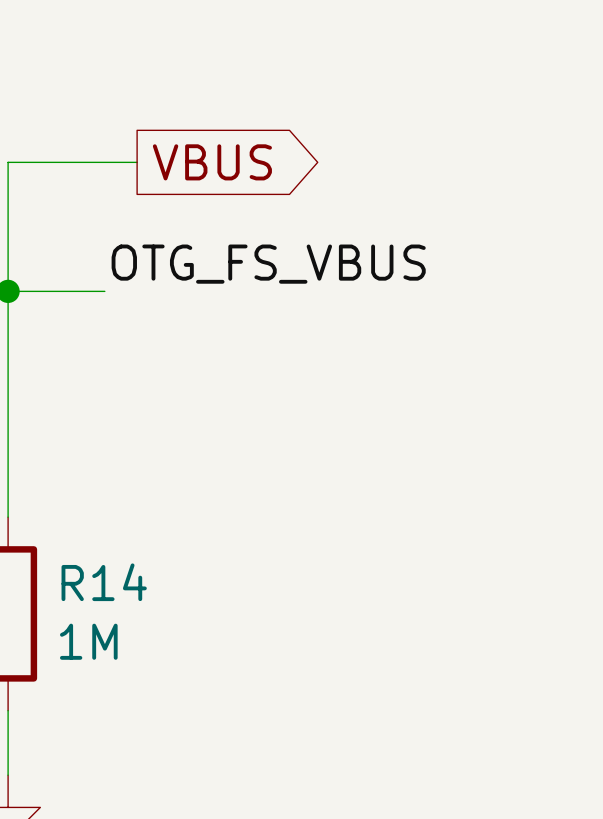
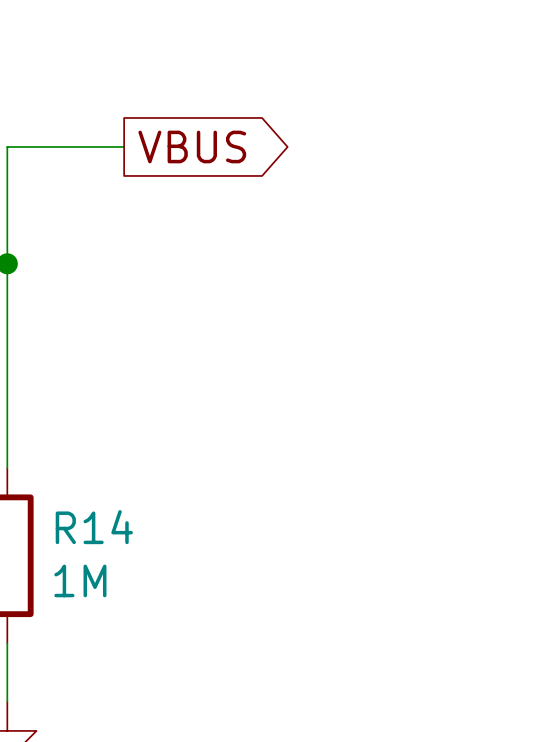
label: OTG_FS_VBUS (268, 264) -> none
wire: (8, 291) (104, 291) -> none

